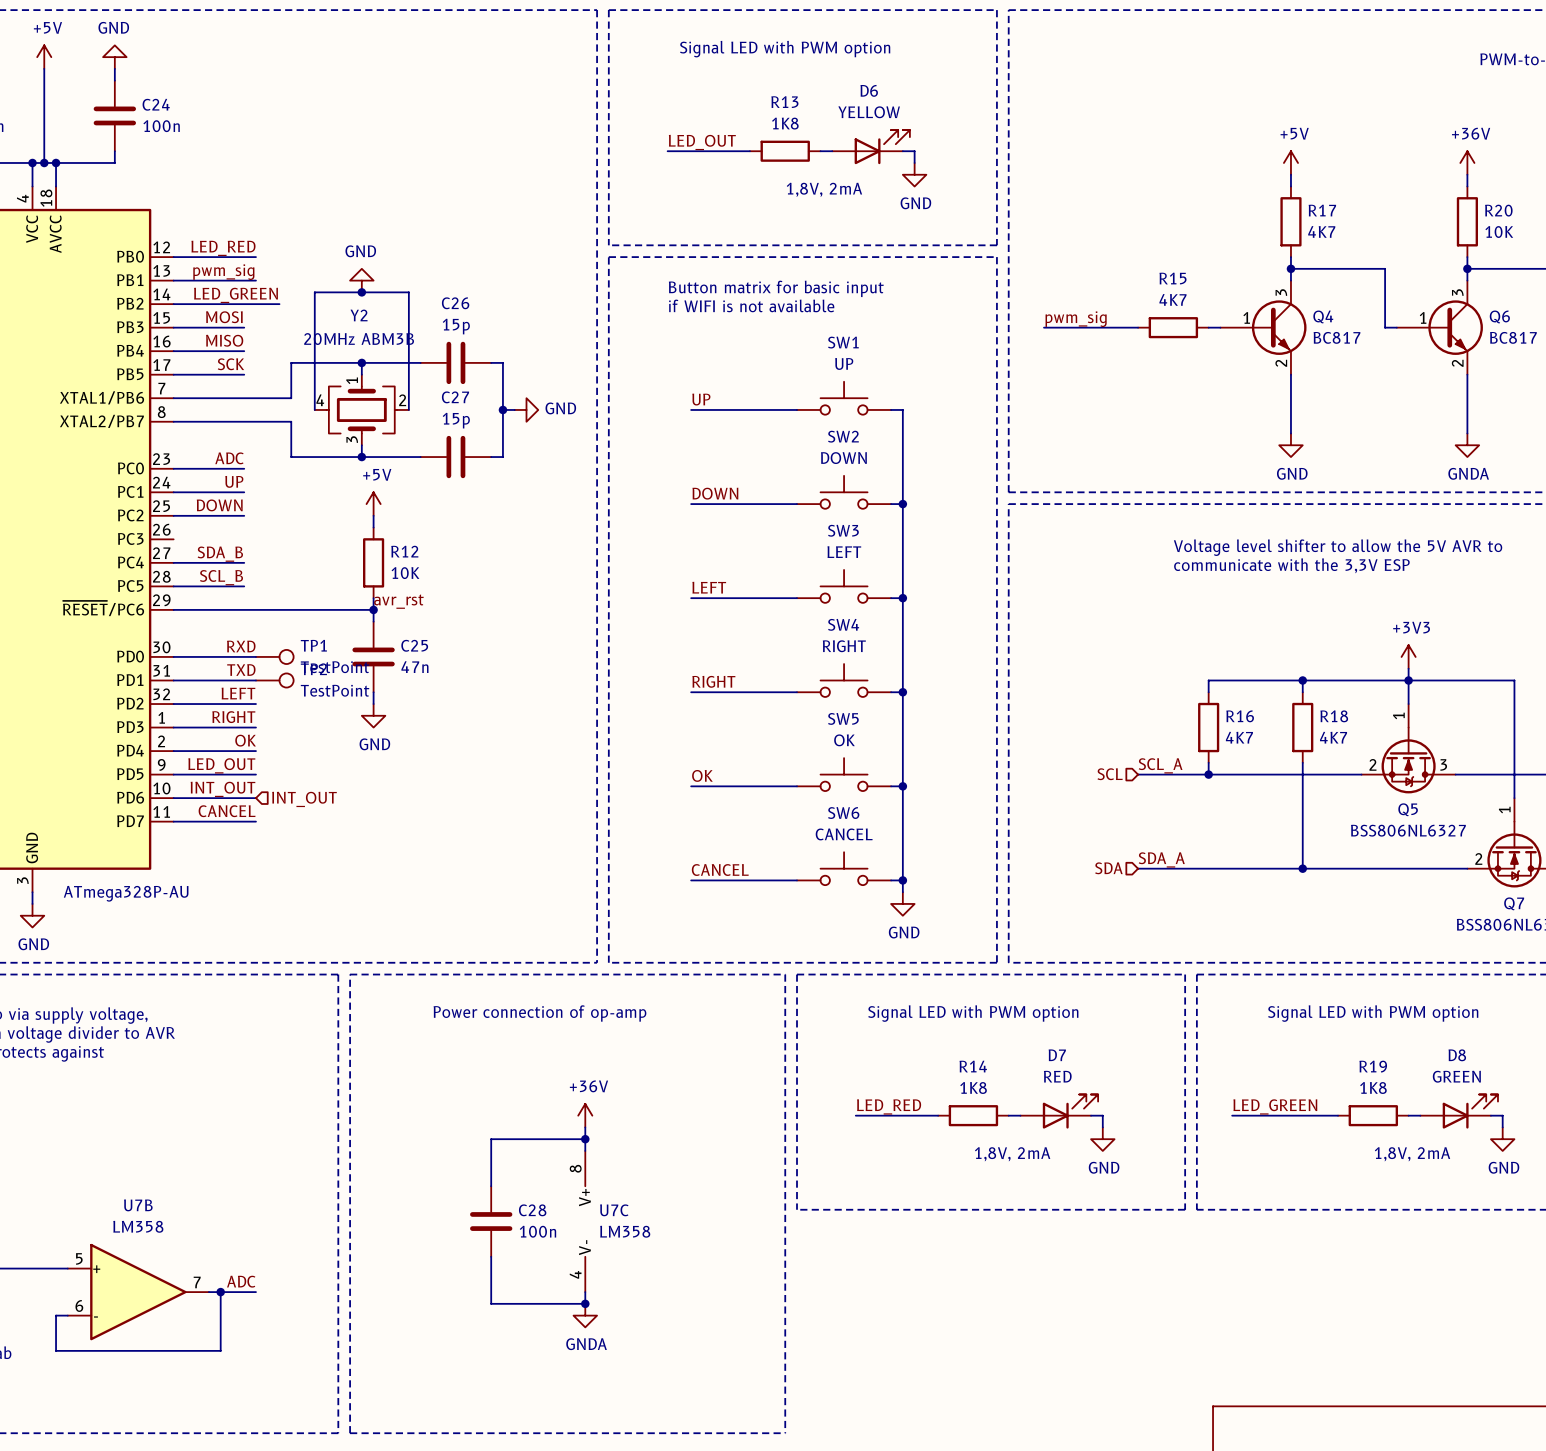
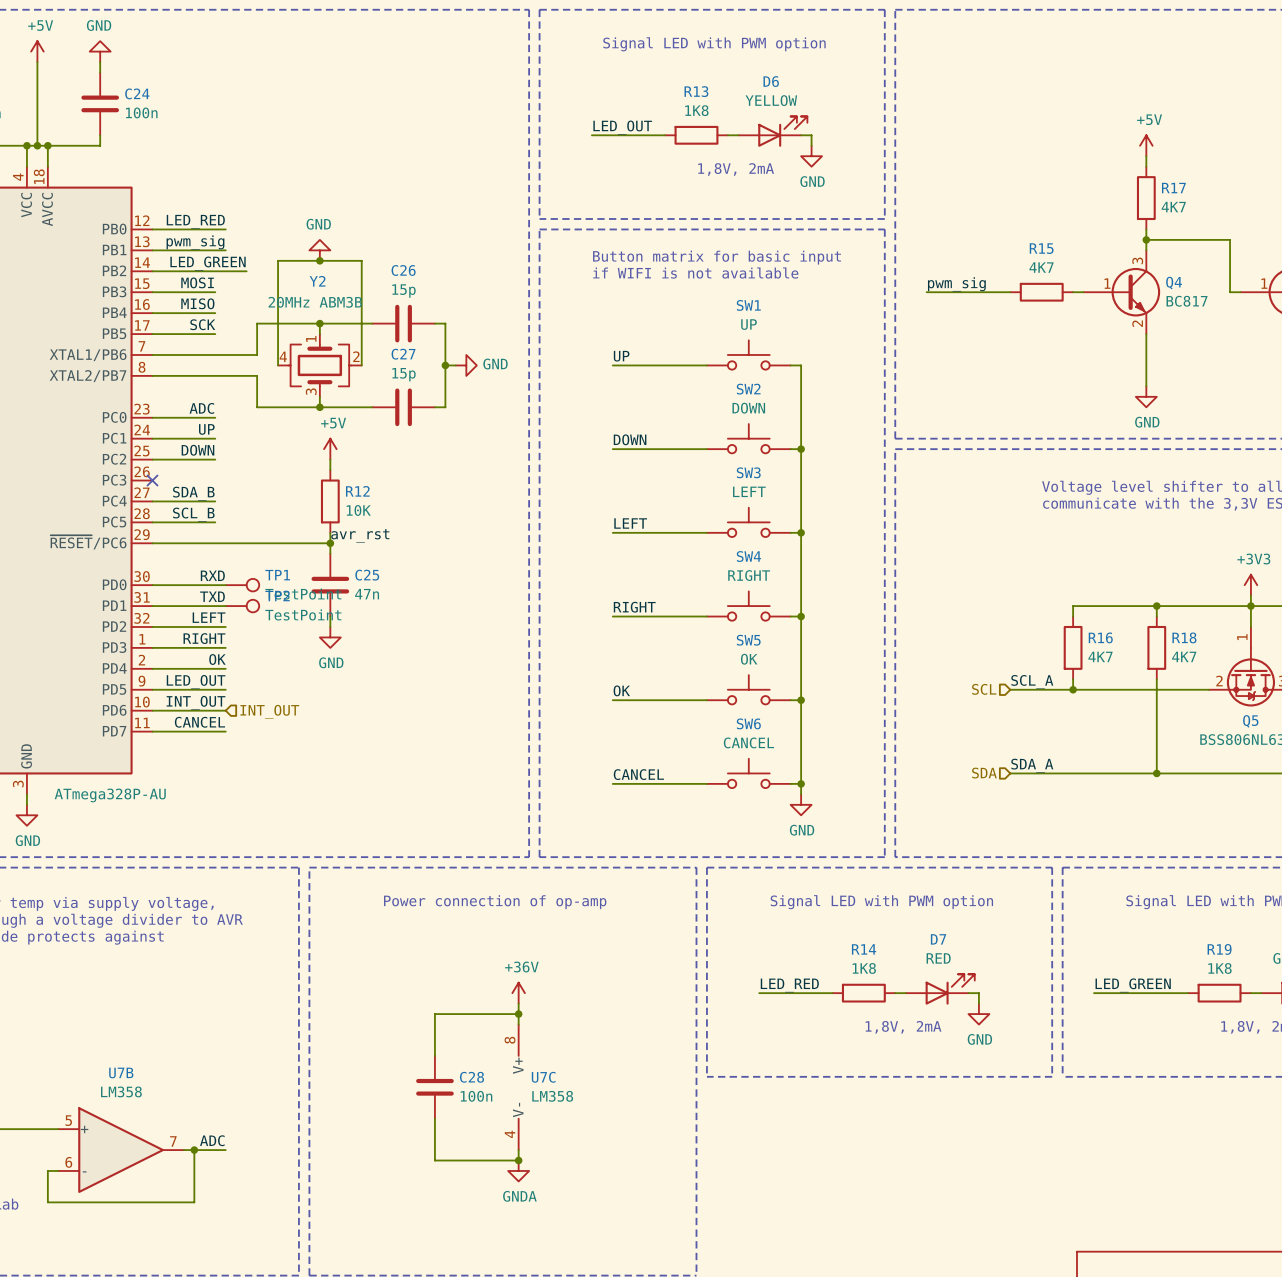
no-connect mark: none -> (152, 480)

